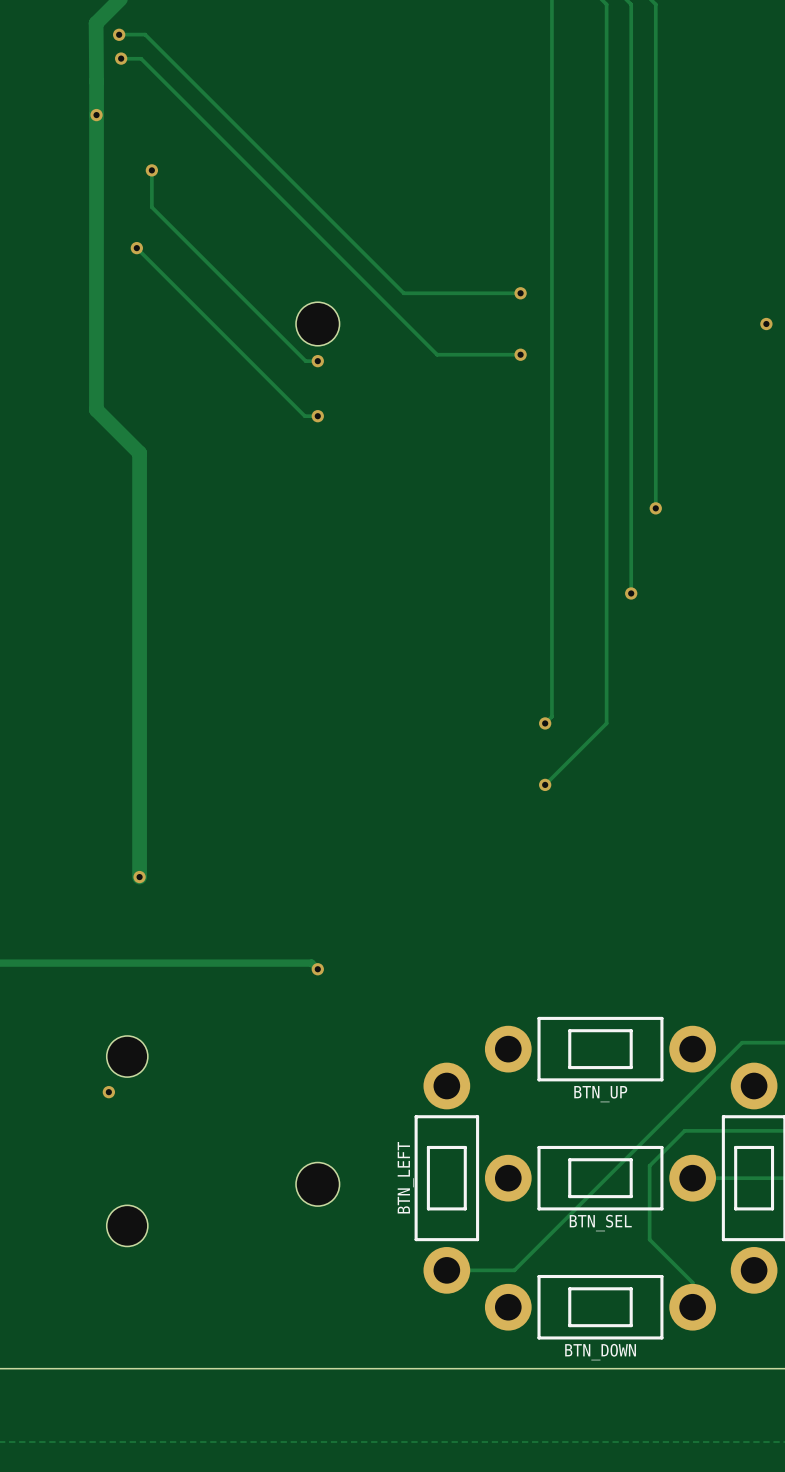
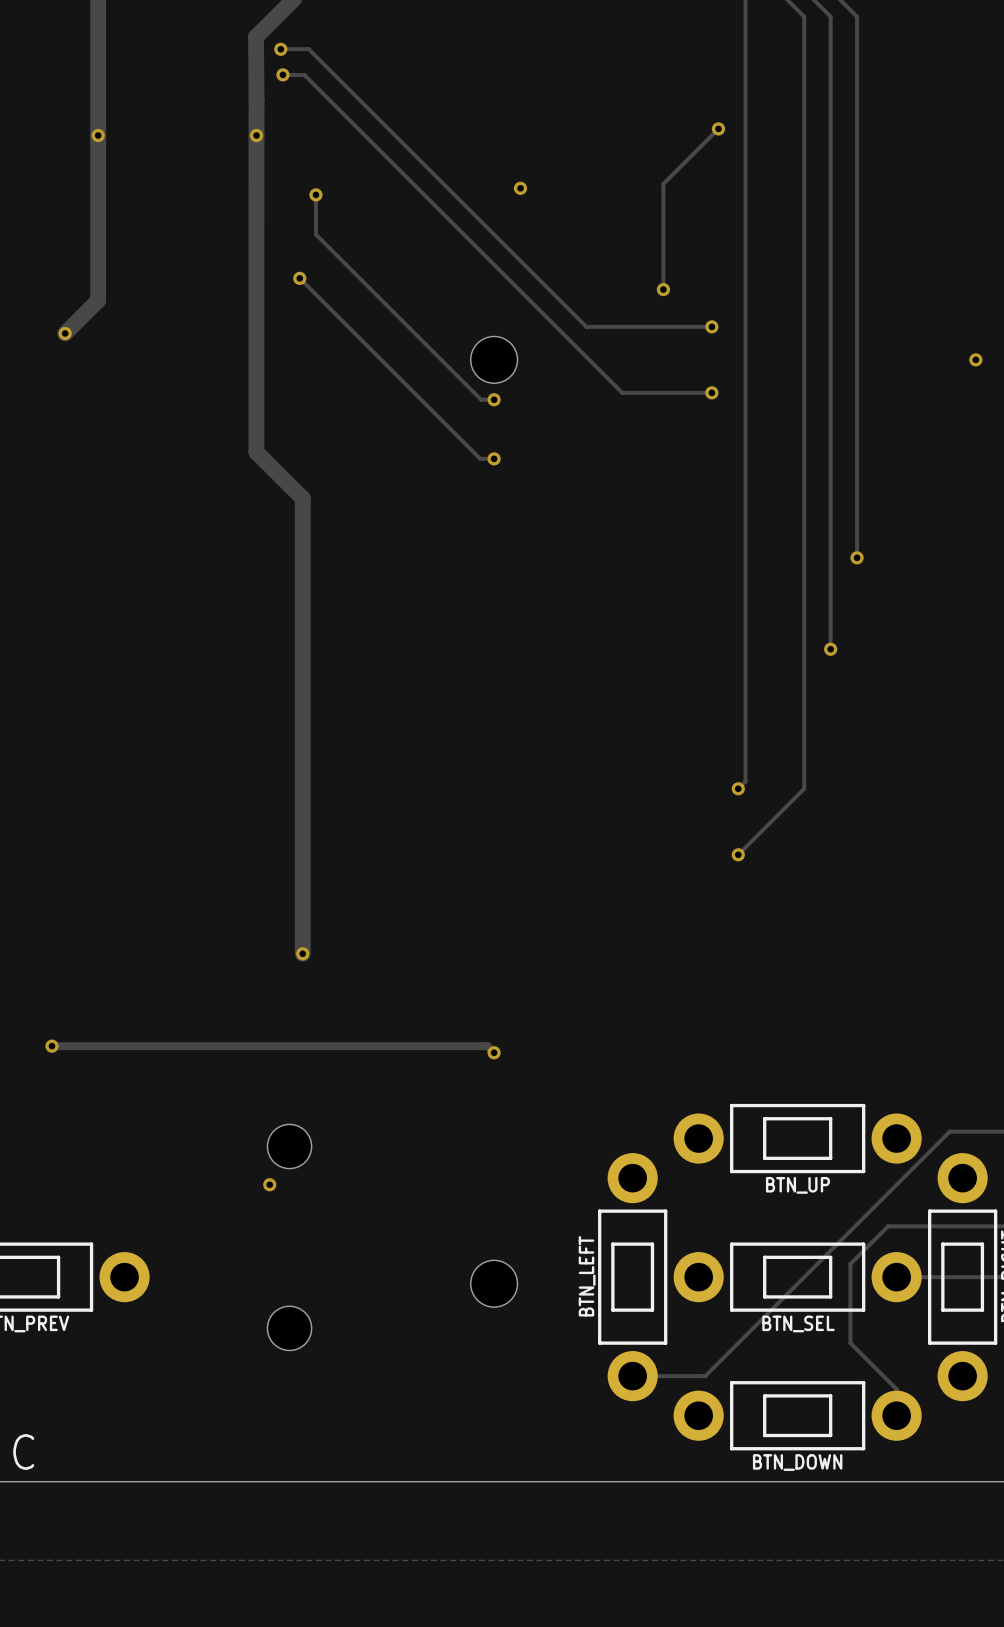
track: none -> (718, 128) (663, 183) (663, 289)
via: none -> (718, 128)
via: none -> (520, 188)
via: none -> (663, 289)

